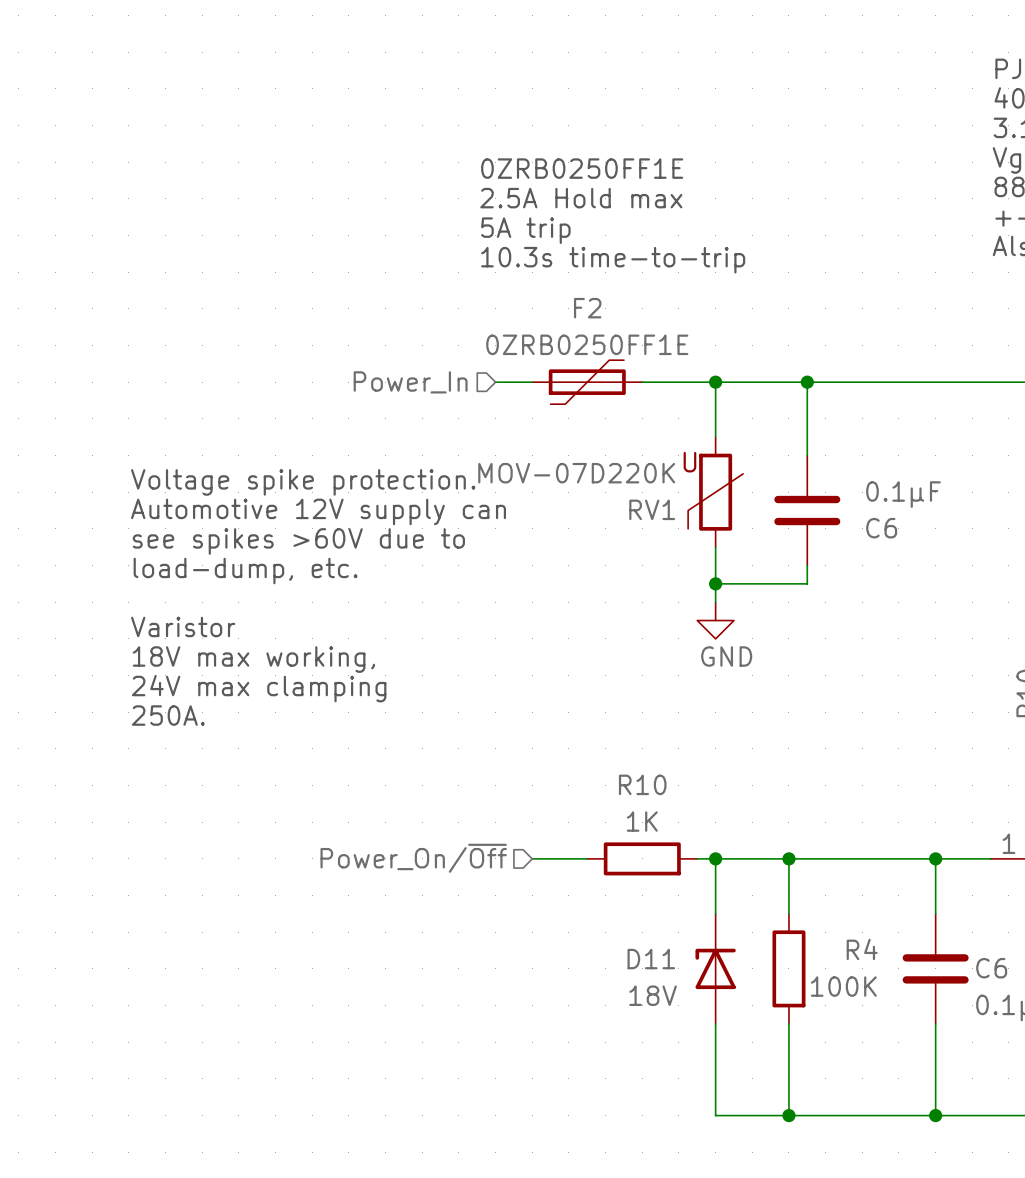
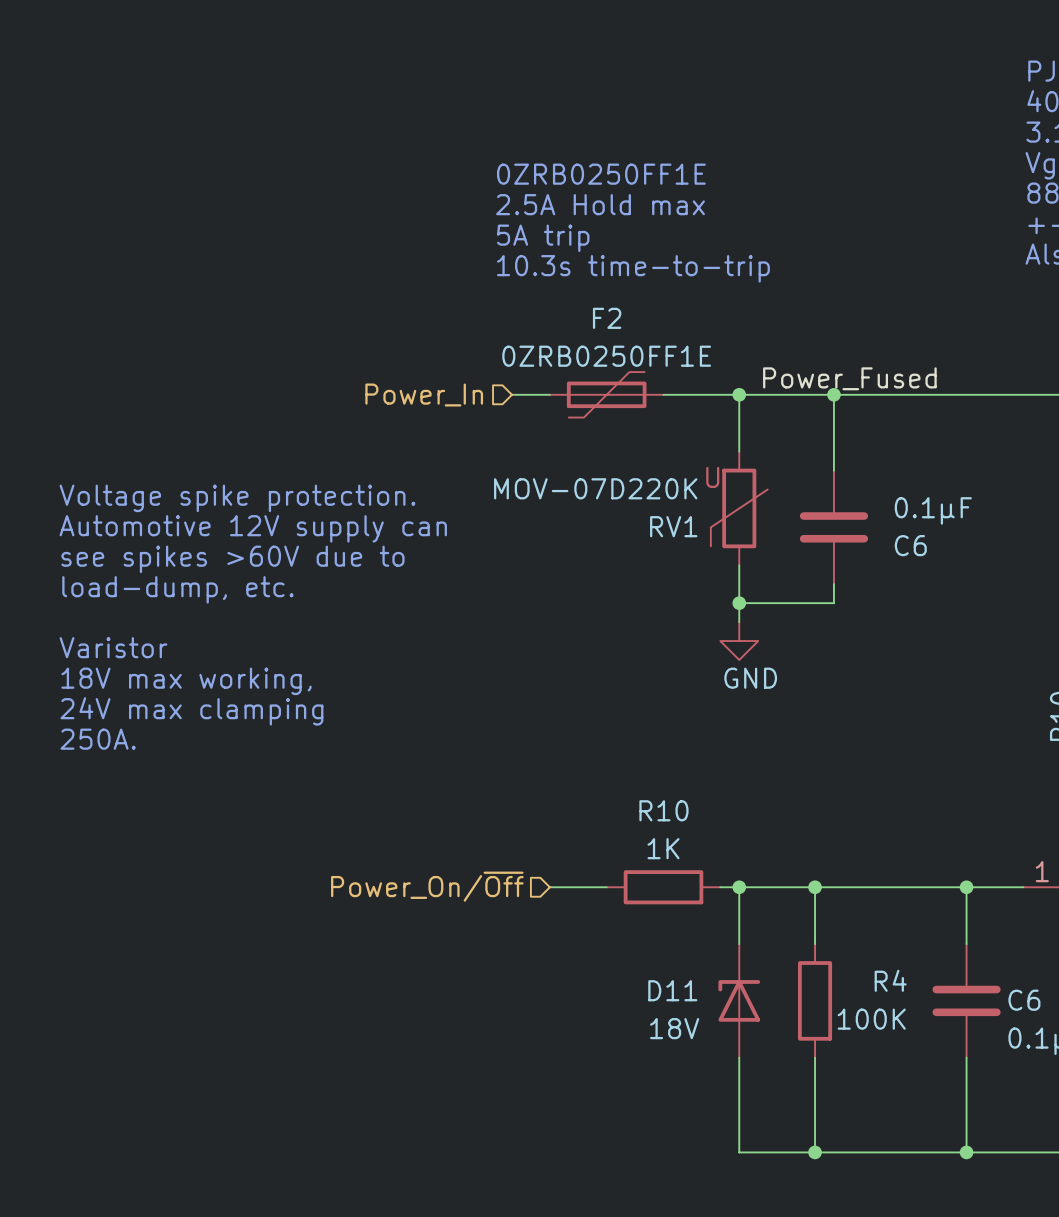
label: none -> Power_Fused (849, 378)
text position: Voltage spike protection. (303, 482) -> Voltage spike protection. (237, 498)
text position: Automotive 12V supply can (318, 511) -> Automotive 12V supply can (253, 528)
text position: see spikes >60V due to (298, 541) -> see spikes >60V due to (232, 559)
text position: load-dump, etc. (245, 570) -> load-dump, etc. (177, 589)
text position: Varistor (183, 626) -> Varistor (113, 647)
text position: 18V max working, (253, 659) -> 18V max working, (186, 681)
text position: 24V max clamping (259, 688) -> 24V max clamping (191, 711)
text position: 250A. (168, 715) -> 250A. (98, 739)

